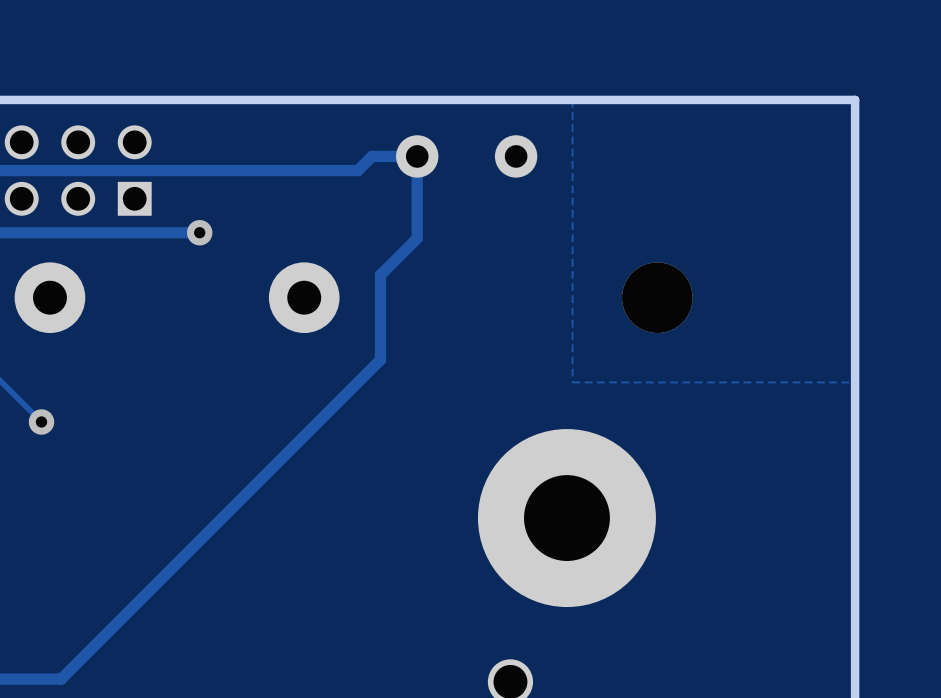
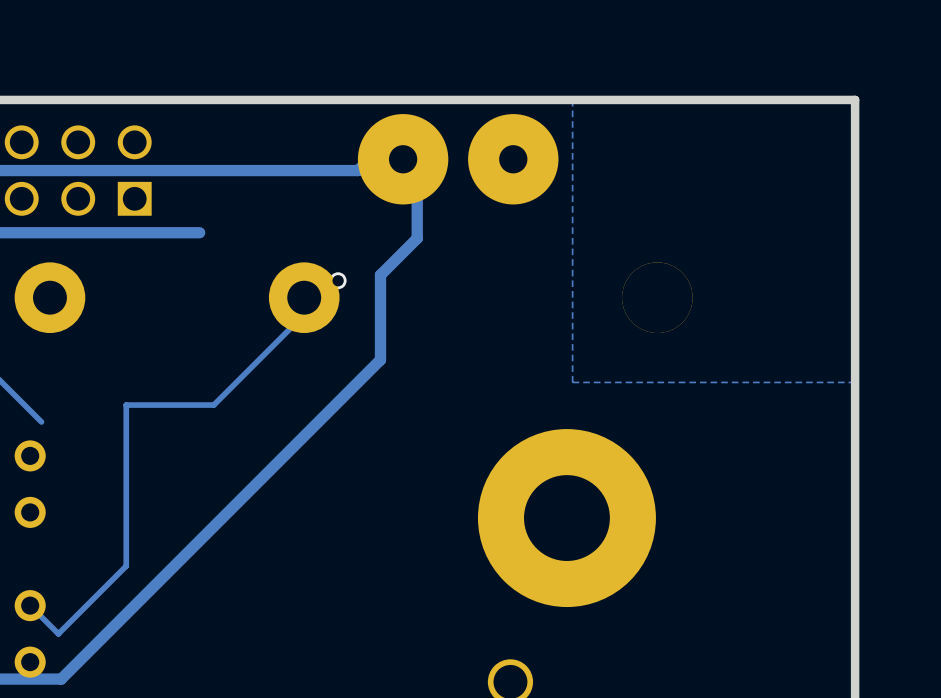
part footprint: [396, 135, 439, 178] -> [357, 114, 449, 205]
part footprint: [494, 135, 538, 178] -> [468, 114, 559, 205]
via: (199, 232) -> none
track: none -> (338, 280) (213, 405) (126, 405) (126, 566) (58, 633) (30, 605)
via: none -> (338, 280)
via: (41, 421) -> none
part: none -> (30, 484)
part: none -> (30, 633)

